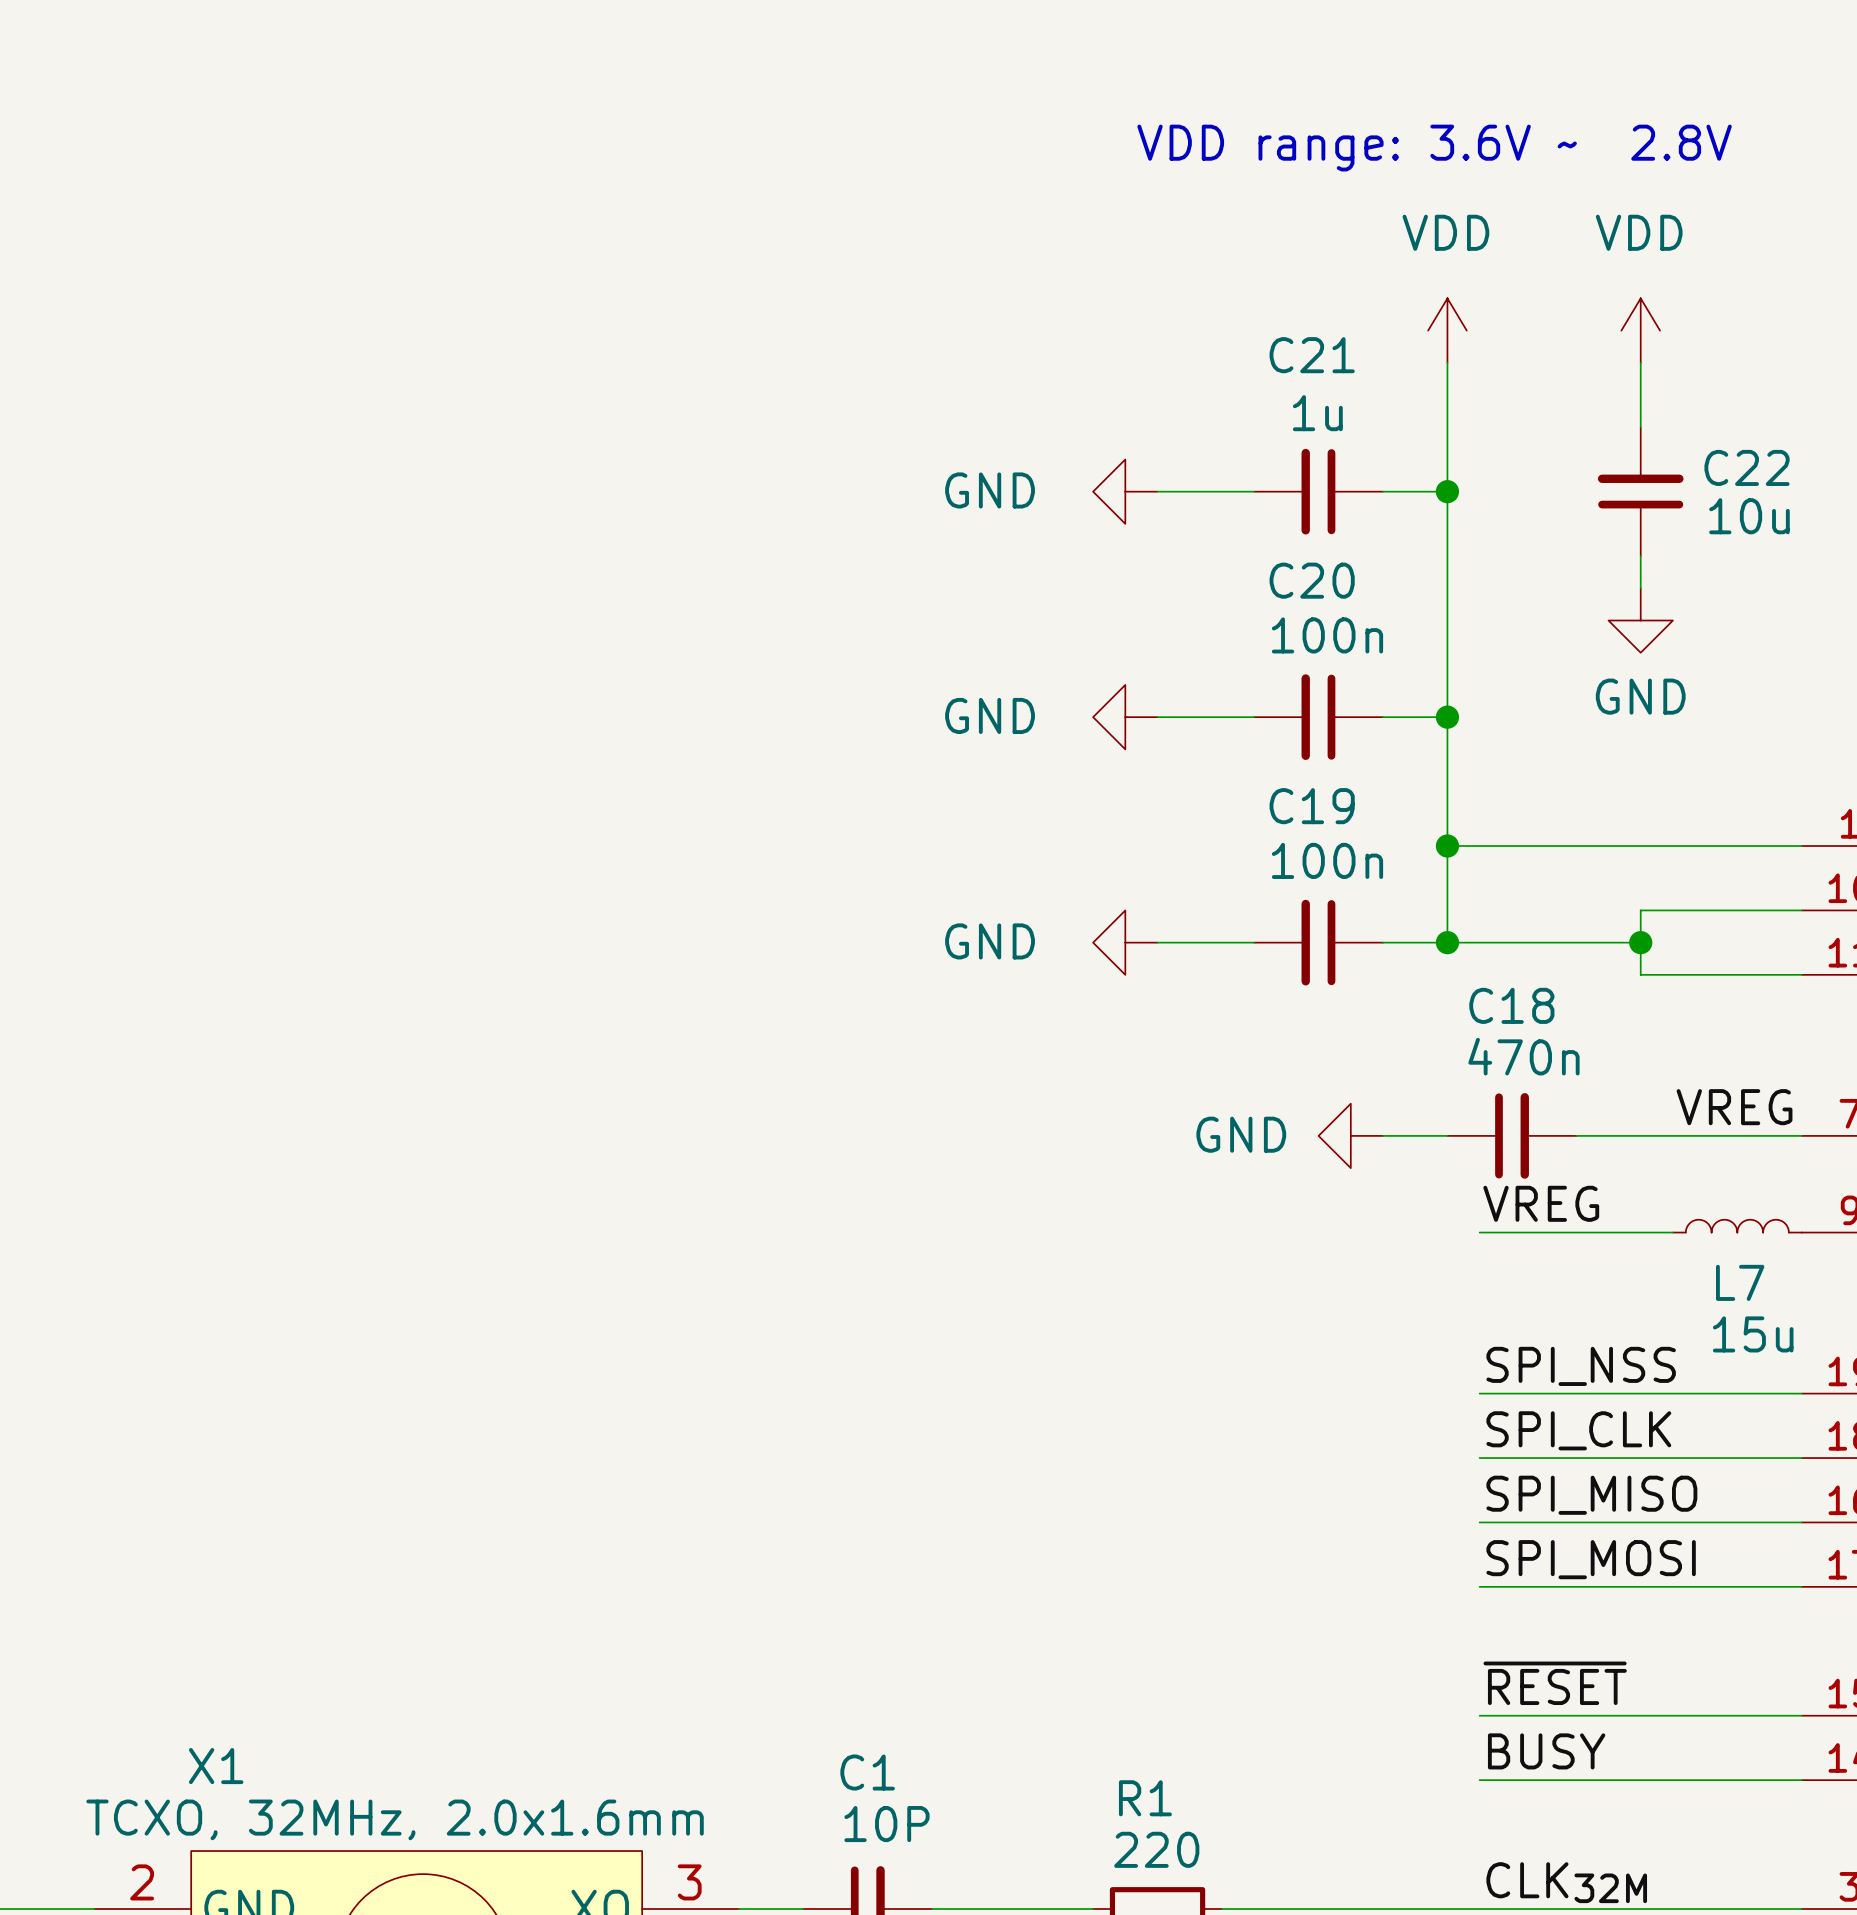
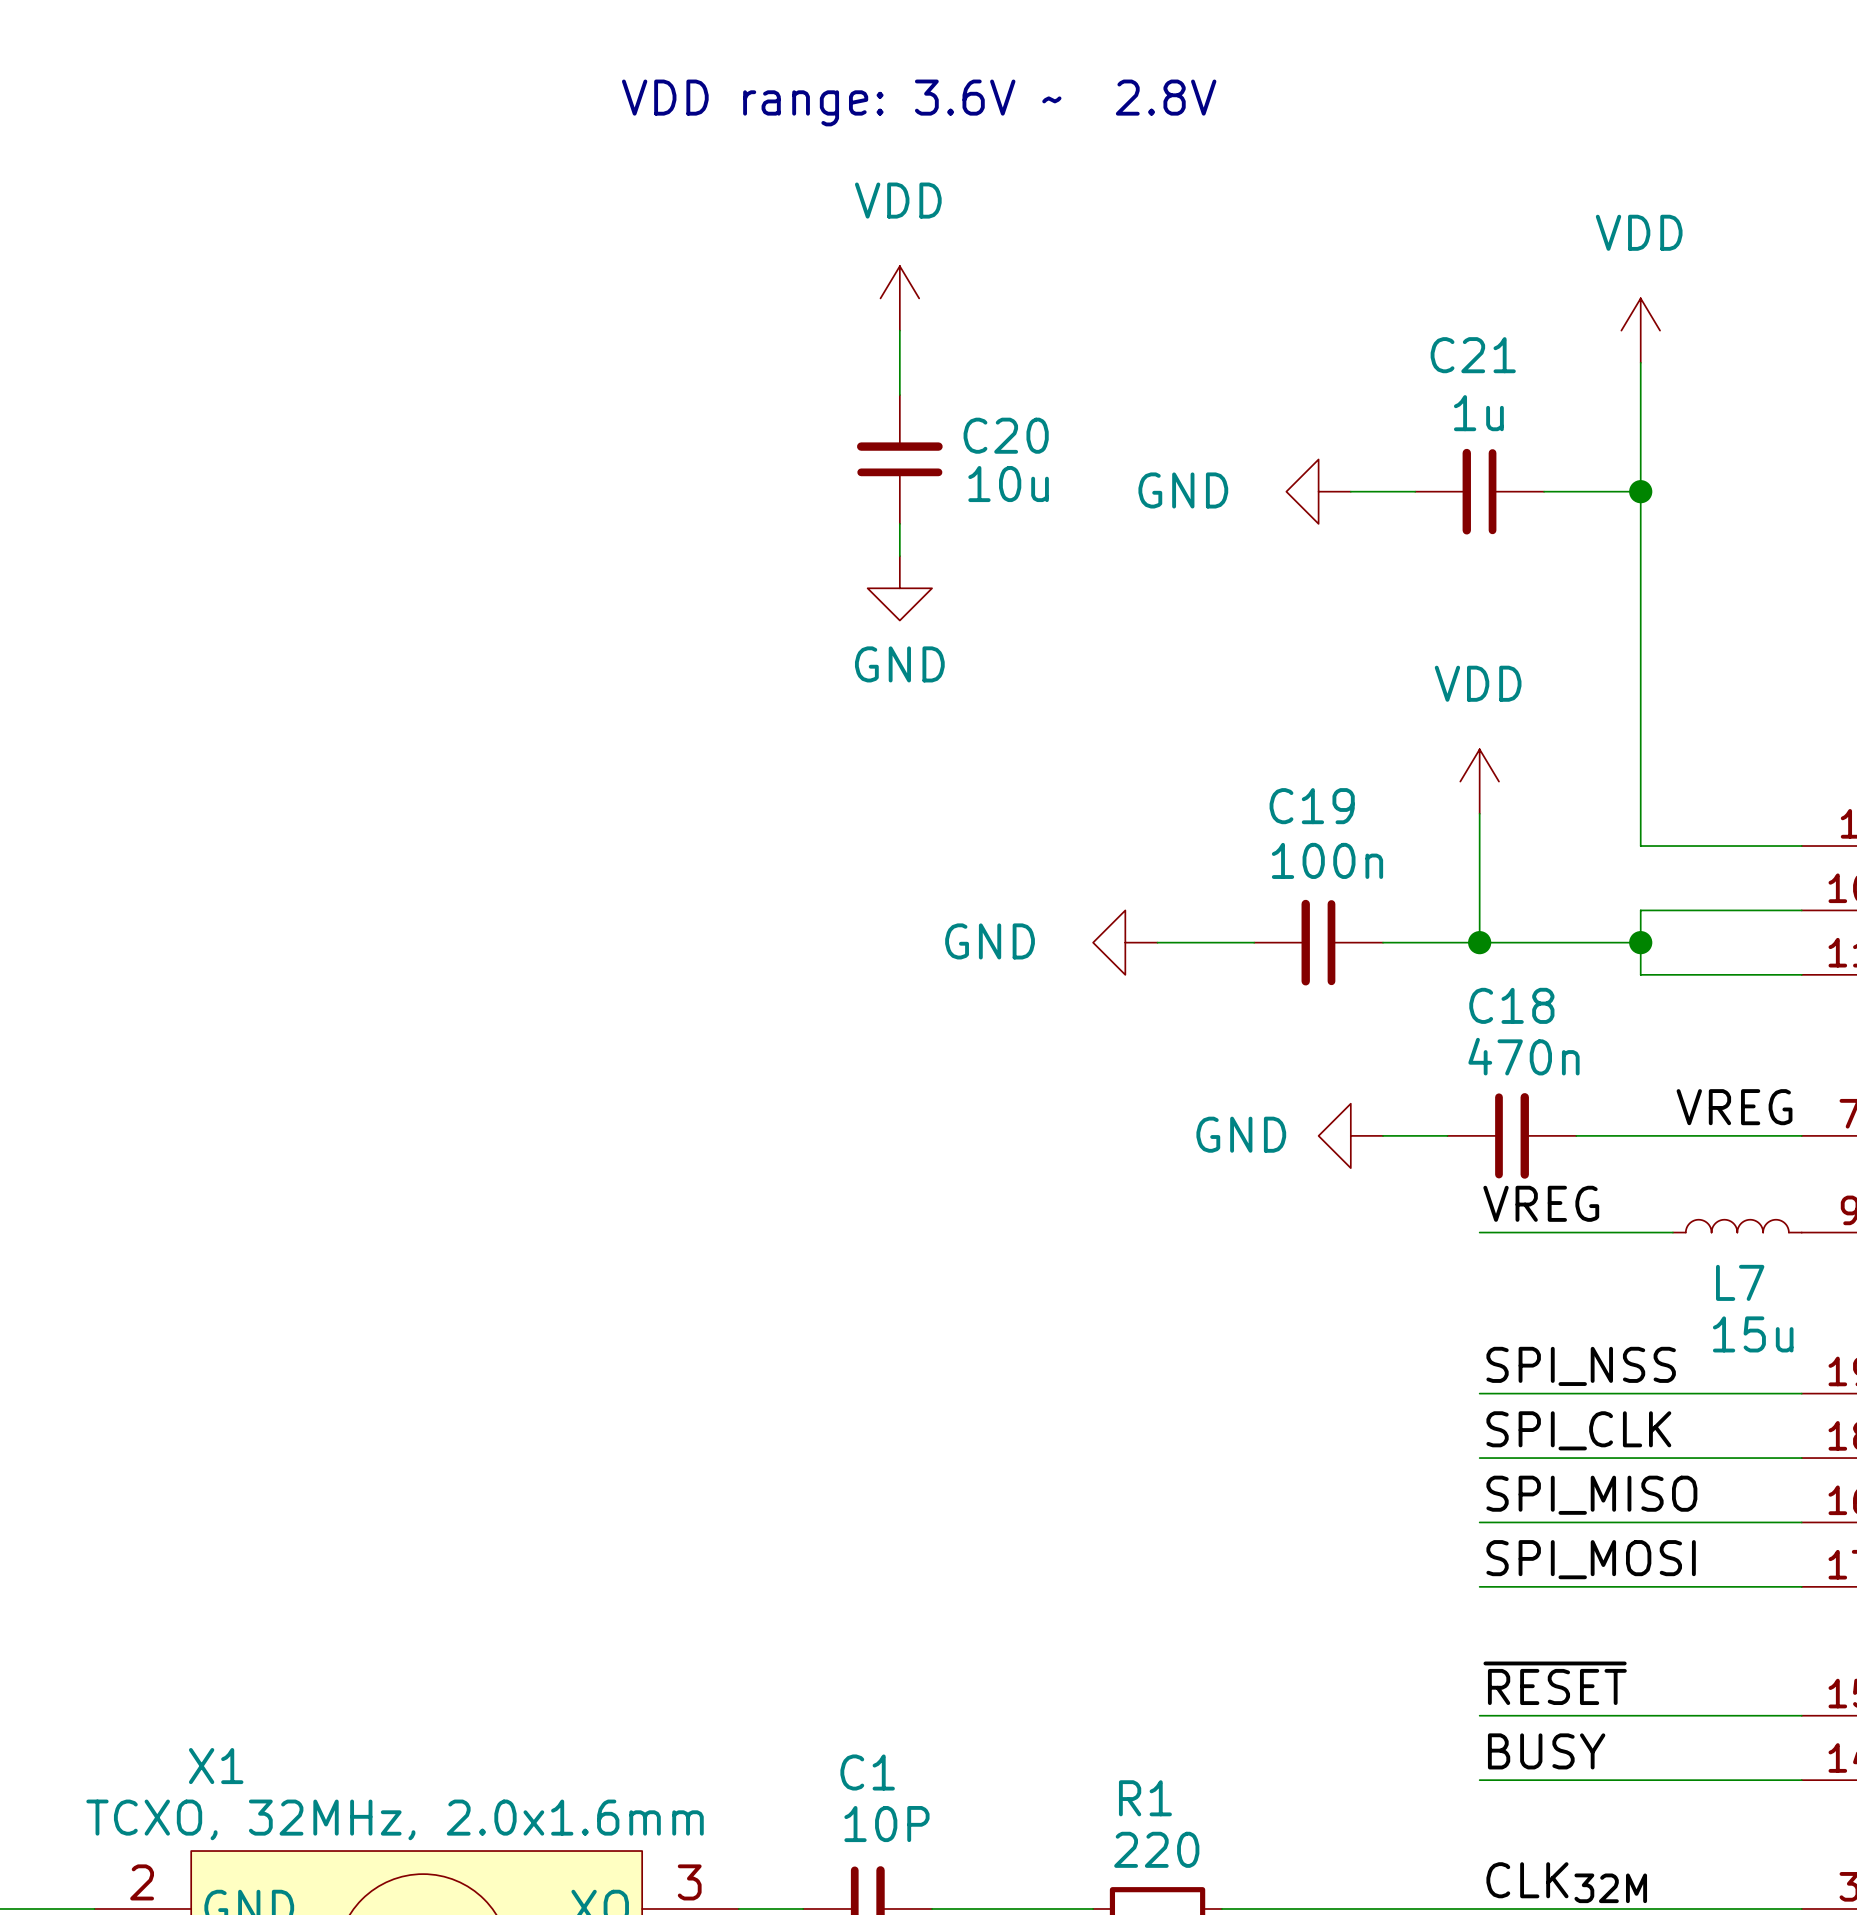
text position: VDD range: 3.6V ~ 2.8V (1434, 148) -> VDD range: 3.6V ~ 2.8V (919, 102)
power symbol: none -> VDD (899, 298)
wire: none -> (899, 330) (899, 395)
power symbol: VDD (1447, 330) -> none
wire: (1447, 362) (1447, 942) -> none
power symbol: GND (1125, 491) -> none
wire: (1157, 491) (1254, 491) -> (1544, 491) (1640, 491)
power symbol: none -> GND (1318, 491)
C21 position: (1318, 491) -> (1479, 491)
junction: (1447, 491) -> none
junction: none -> (1640, 491)
C22: 10u (1640, 491) -> none
wire: none -> (899, 523) (899, 556)
power symbol: none -> GND (899, 588)
power symbol: GND (1640, 620) -> none
C20 value: 100n (1327, 635) -> 10u (1008, 484)
power symbol: GND (1125, 717) -> none
wire: (1157, 717) (1254, 717) -> none
C20 rotation: 0° (1318, 717) -> 90° clockwise (899, 459)
C20 position: (1318, 717) -> (899, 459)
wire: (1383, 717) (1447, 717) -> none
junction: (1447, 717) -> none
power symbol: none -> VDD (1479, 781)
wire: none -> (1479, 813) (1479, 942)
wire: (1447, 846) (1640, 846) -> (1640, 588) (1640, 846)
junction: (1447, 846) -> none
junction position: (1447, 942) -> (1479, 942)

